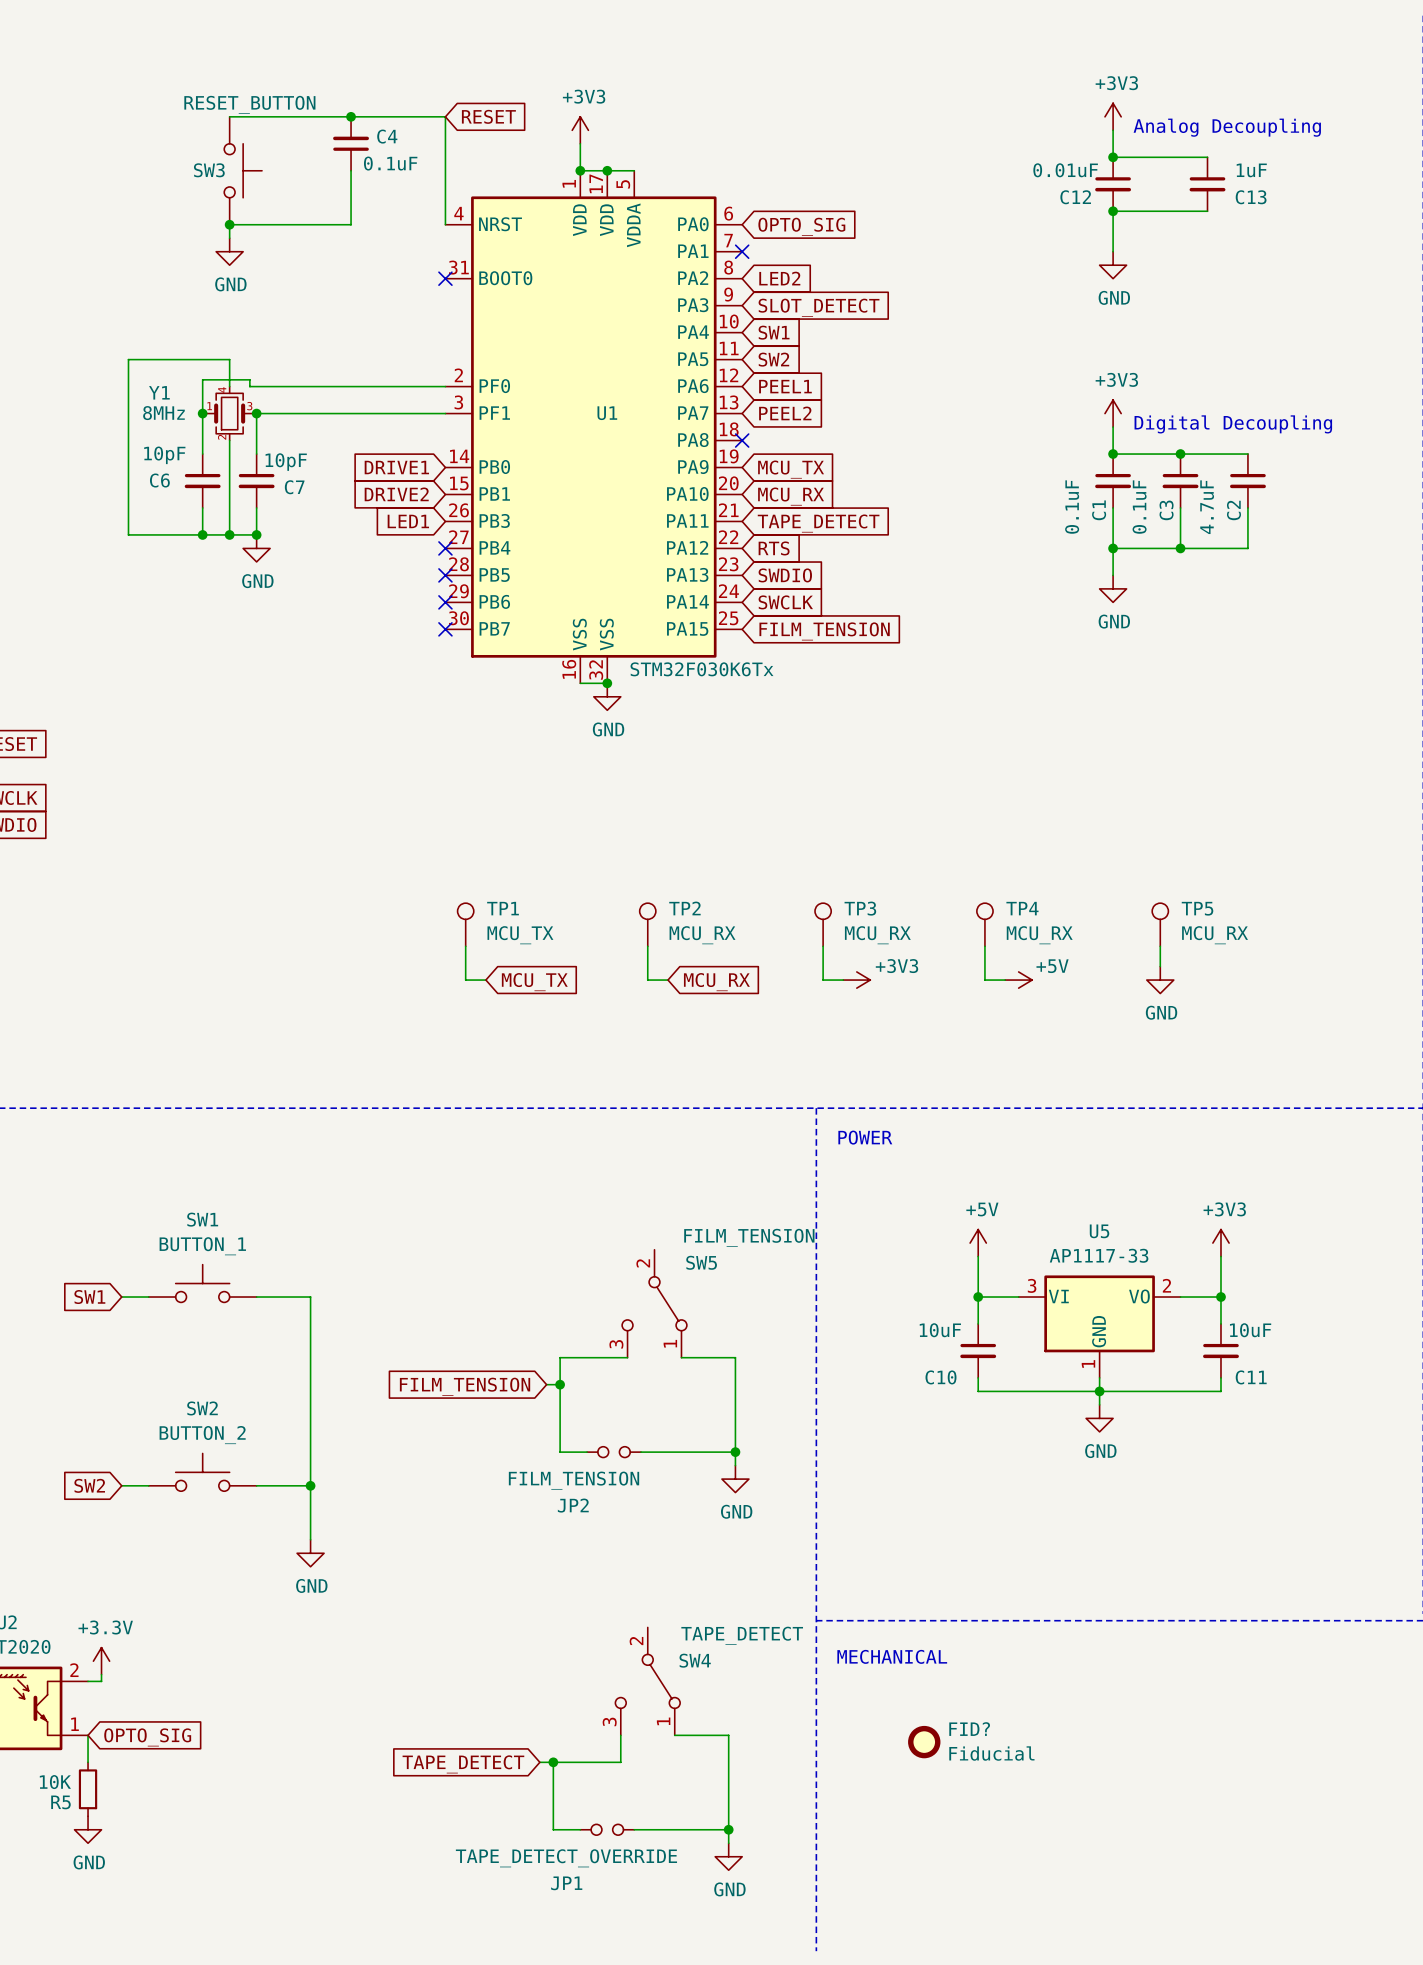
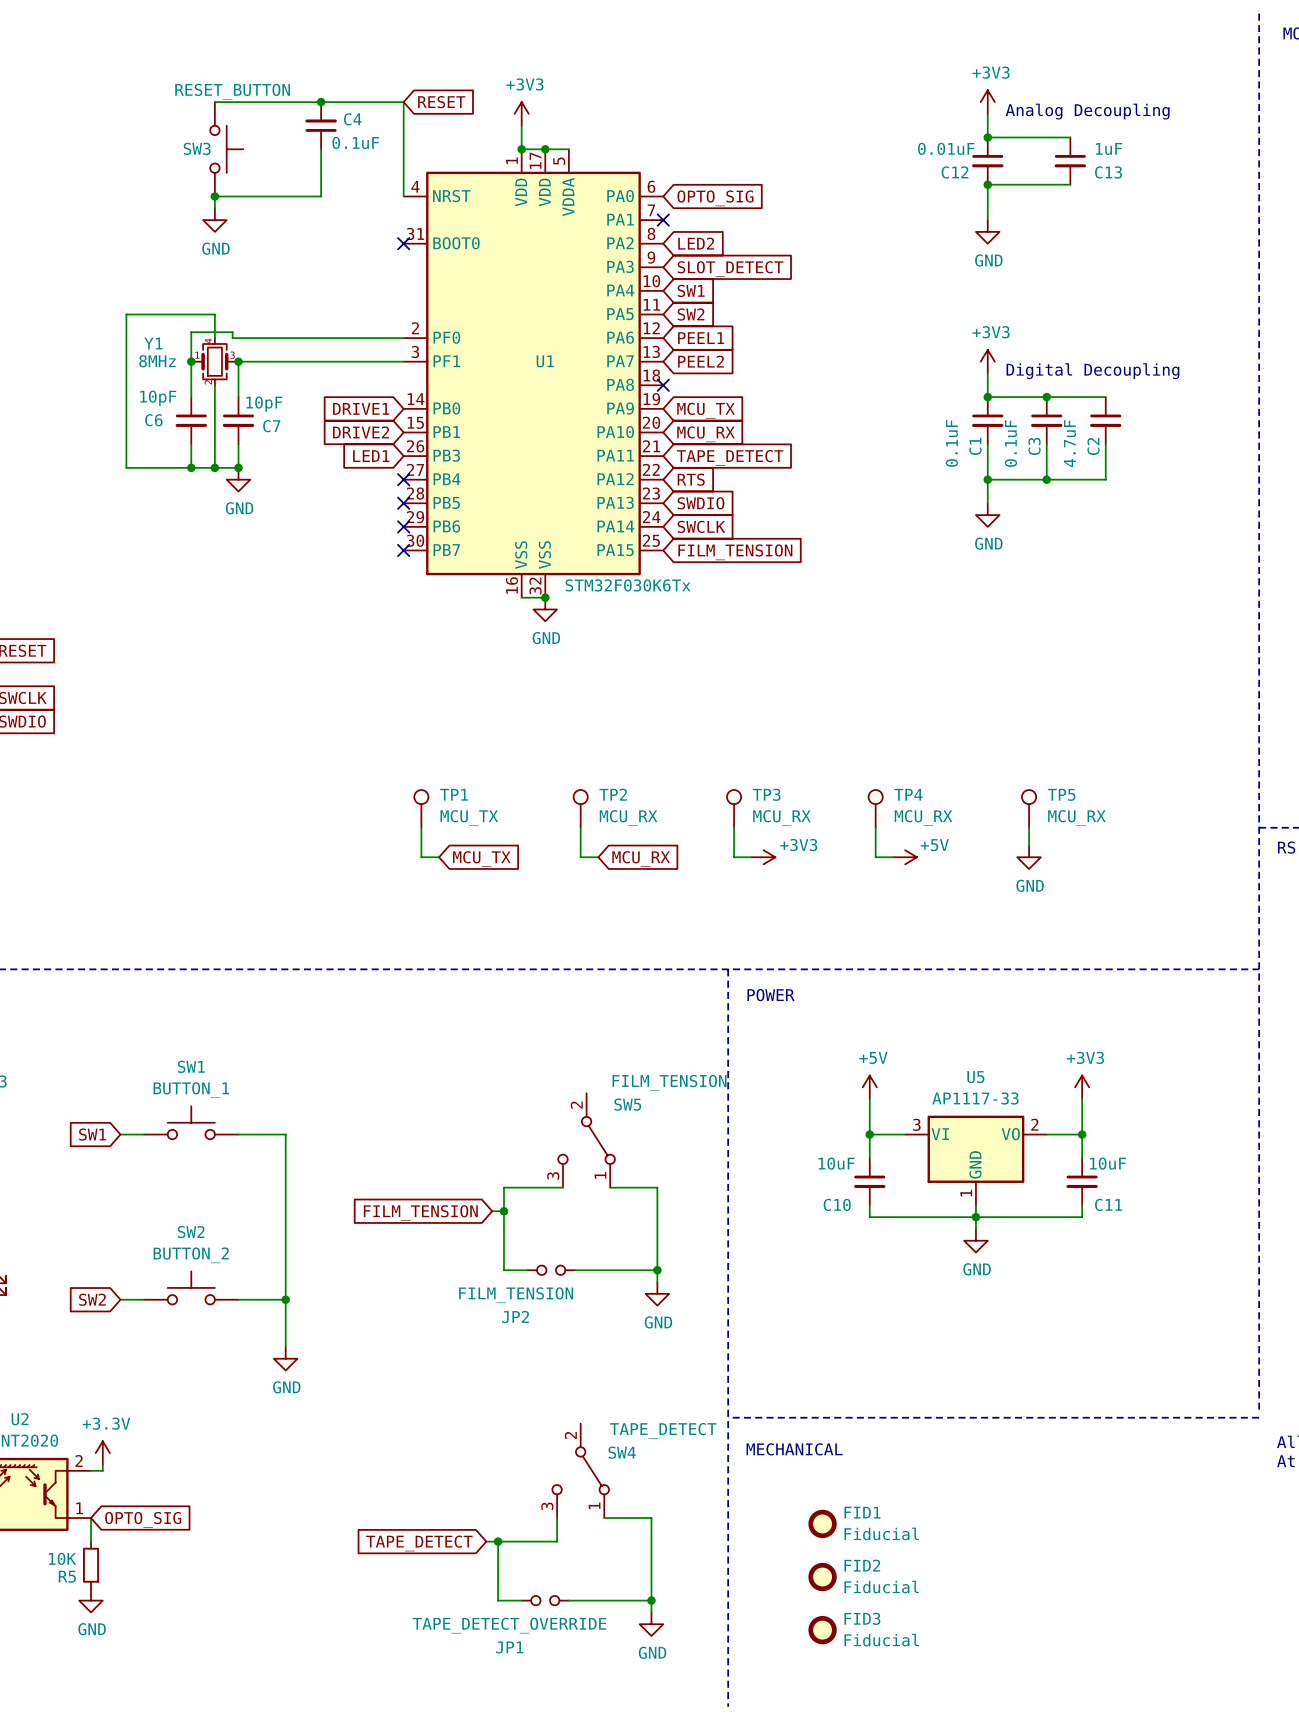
FID? name: FID? (969, 1729) -> FID1 (862, 1512)
FID2: none -> Fiducial (822, 1577)
FID3: none -> Fiducial (822, 1630)

